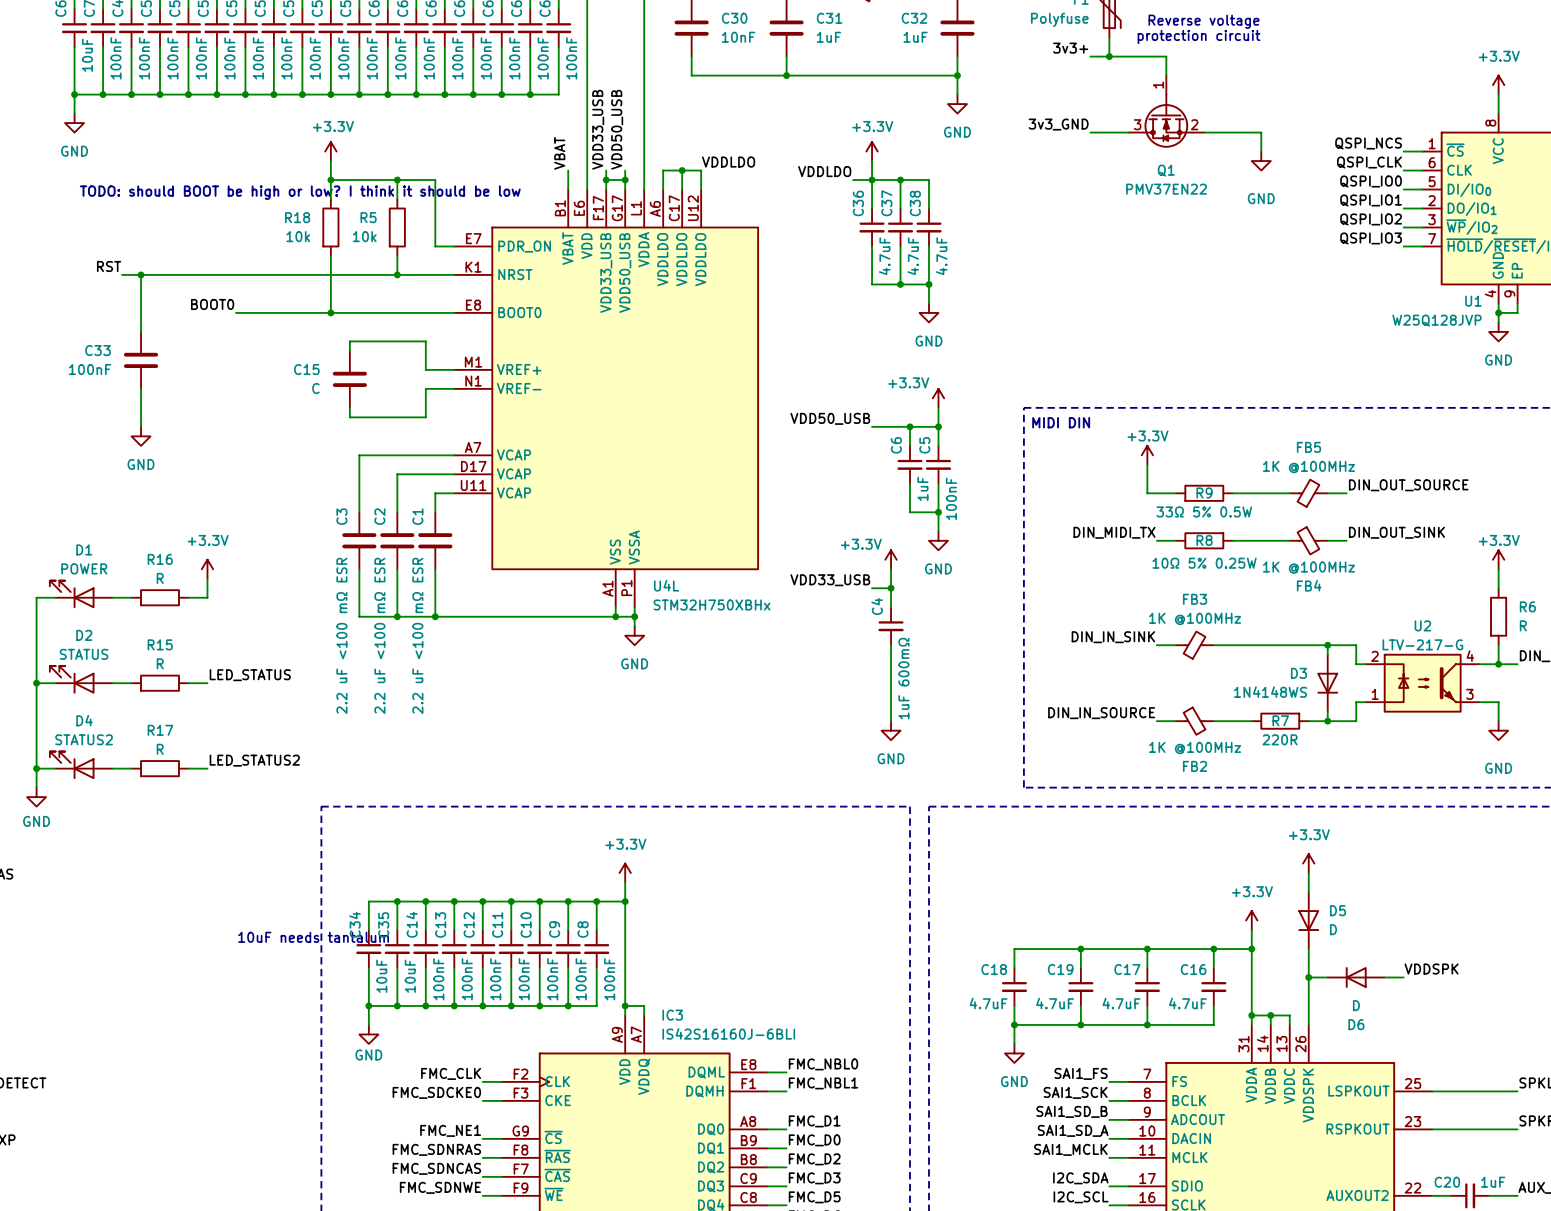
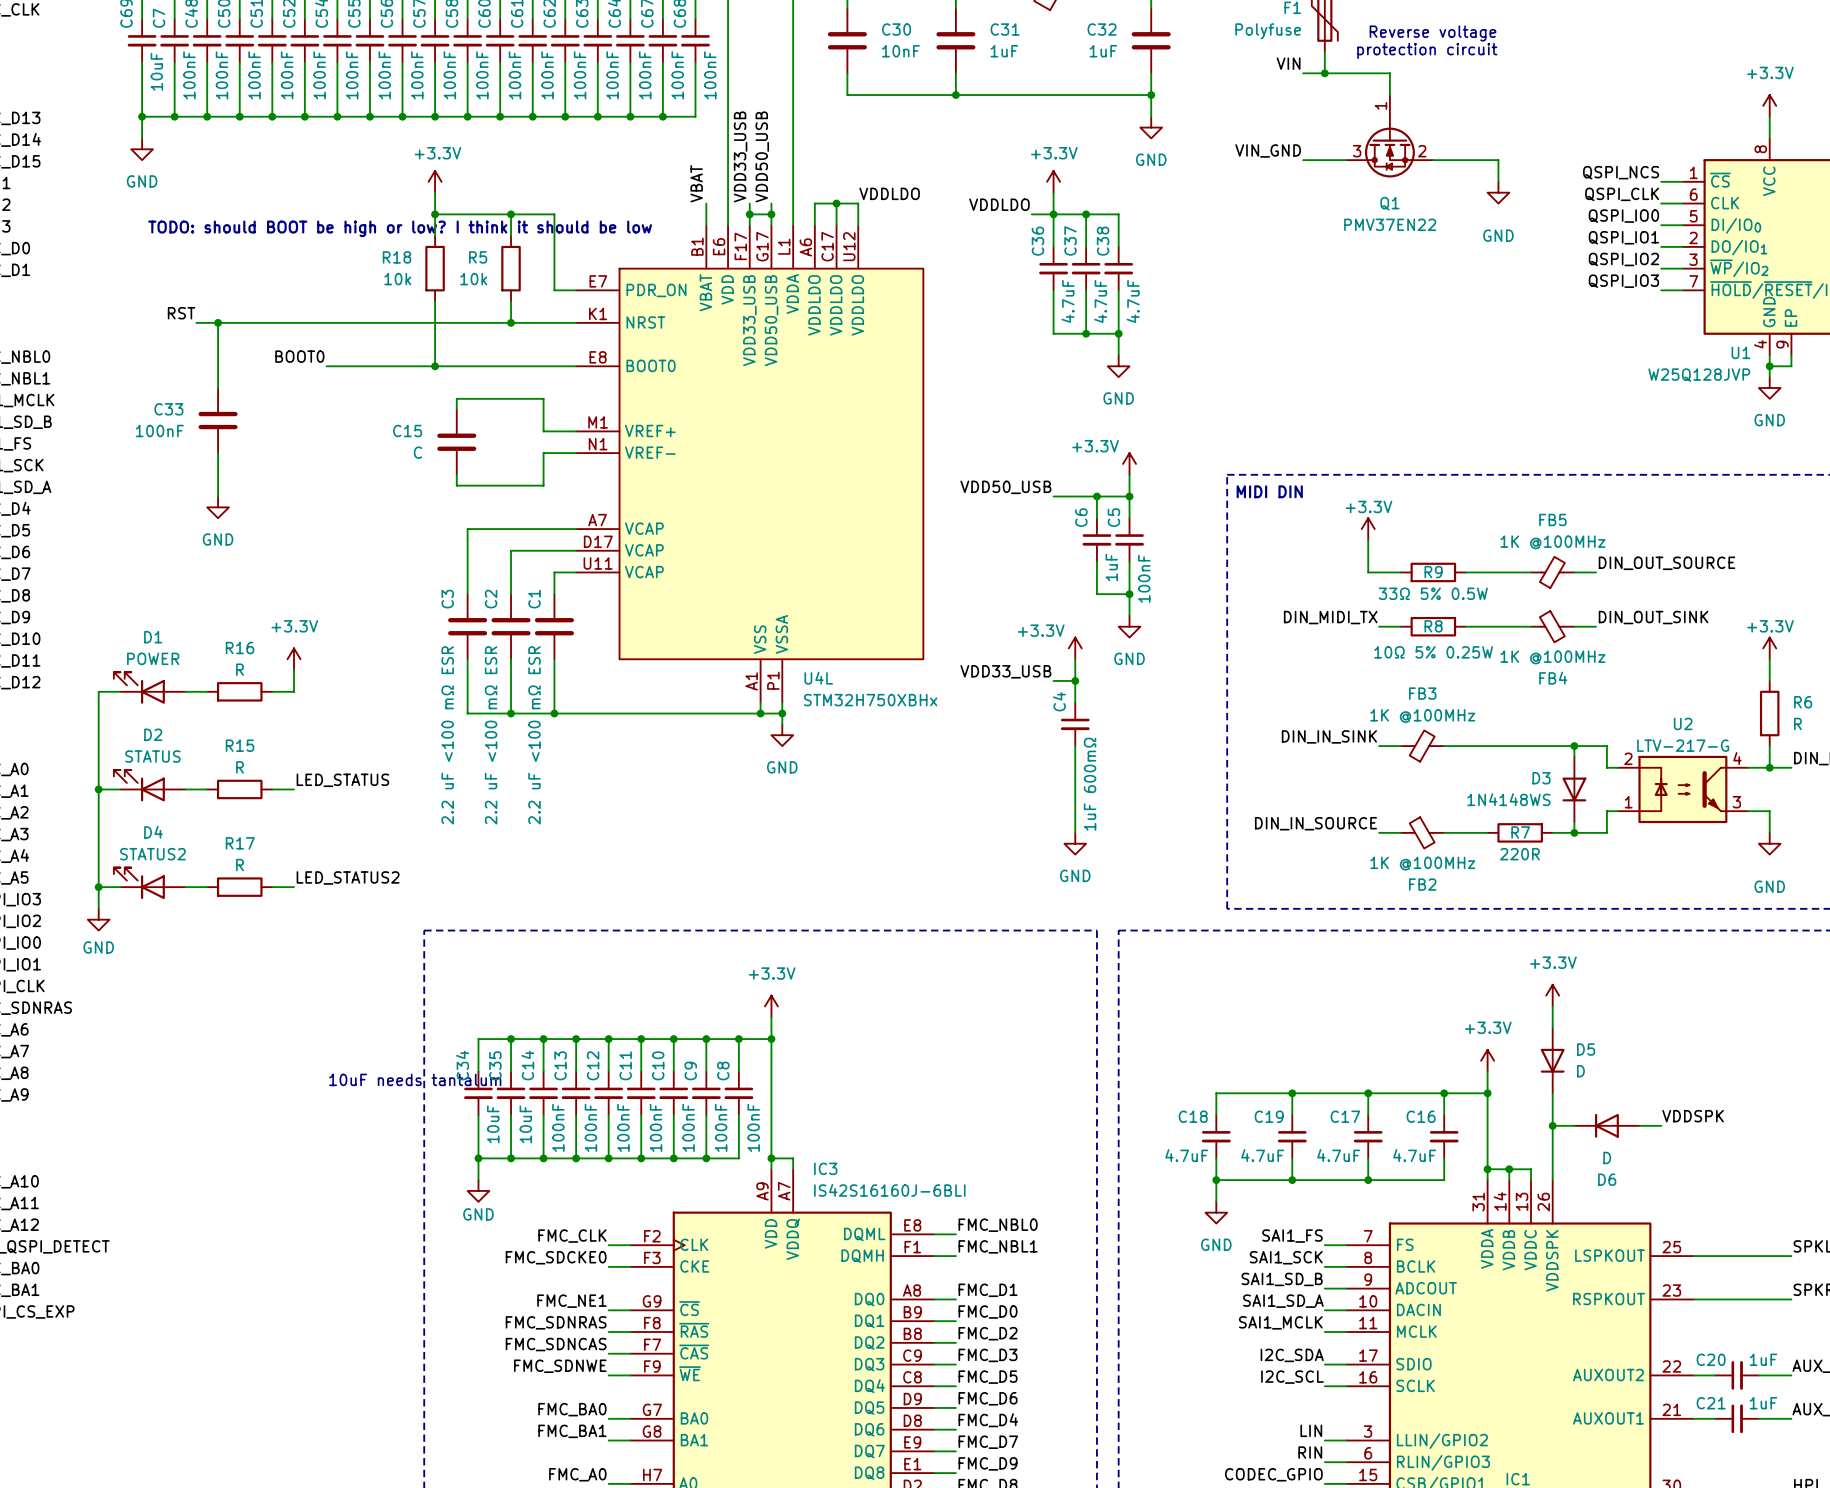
label: 3v3+ (1070, 48) -> VIN (1288, 63)
label: 3v3_GND (1058, 124) -> VIN_GND (1268, 150)

